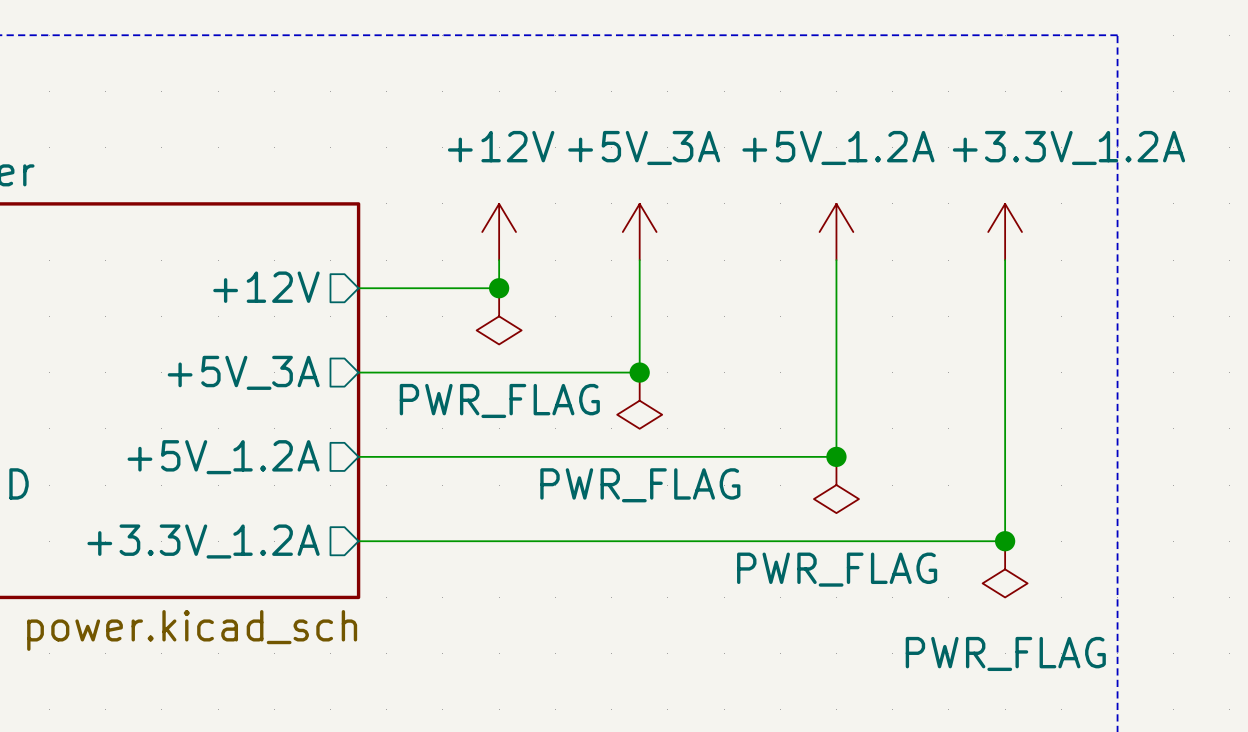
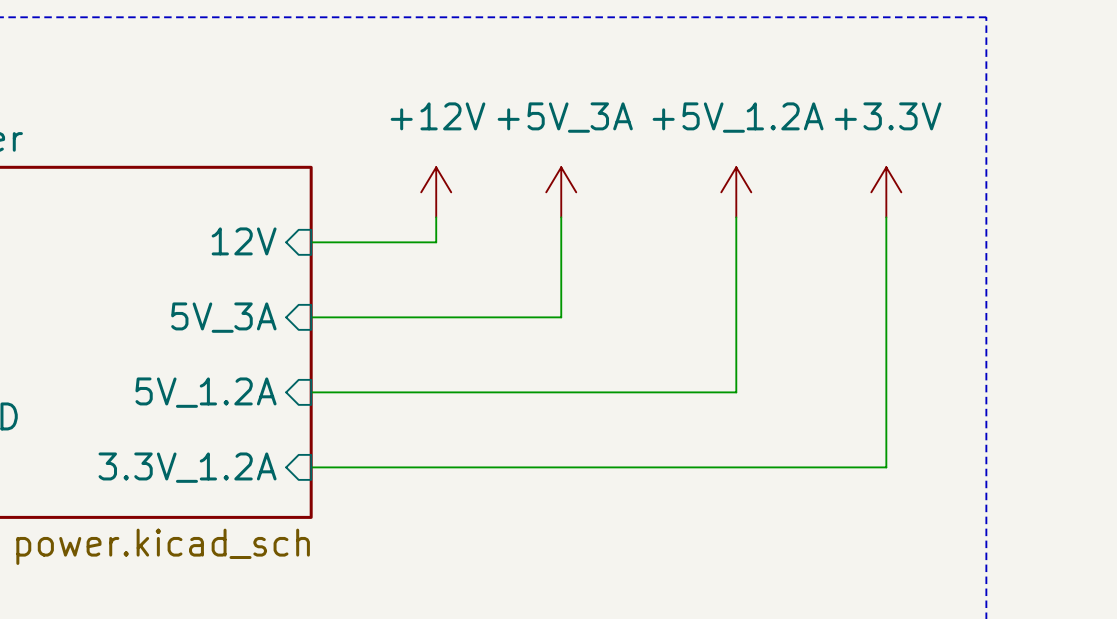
power symbol: +3.3V_1.2A (1005, 232) -> +3.3V (886, 192)
sheet pin shape: output (266, 287) -> input (244, 241)
sheet pin: +12V (266, 287) -> 12V (244, 241)
junction: (499, 288) -> none
power symbol: PWR_FLAG (499, 316) -> none
sheet pin shape: output (243, 372) -> input (223, 317)
sheet pin: +5V_3A (243, 372) -> 5V_3A (223, 317)
junction: (639, 372) -> none
power symbol: PWR_FLAG (639, 400) -> none
junction: (836, 456) -> none
sheet pin shape: output (223, 457) -> input (206, 392)
sheet pin: +5V_1.2A (223, 457) -> 5V_1.2A (206, 392)
power symbol: PWR_FLAG (836, 485) -> none
sheet pin shape: output (203, 541) -> input (187, 467)
sheet pin: +3.3V_1.2A (203, 541) -> 3.3V_1.2A (187, 467)
junction: (1005, 541) -> none
power symbol: PWR_FLAG (1005, 569) -> none

